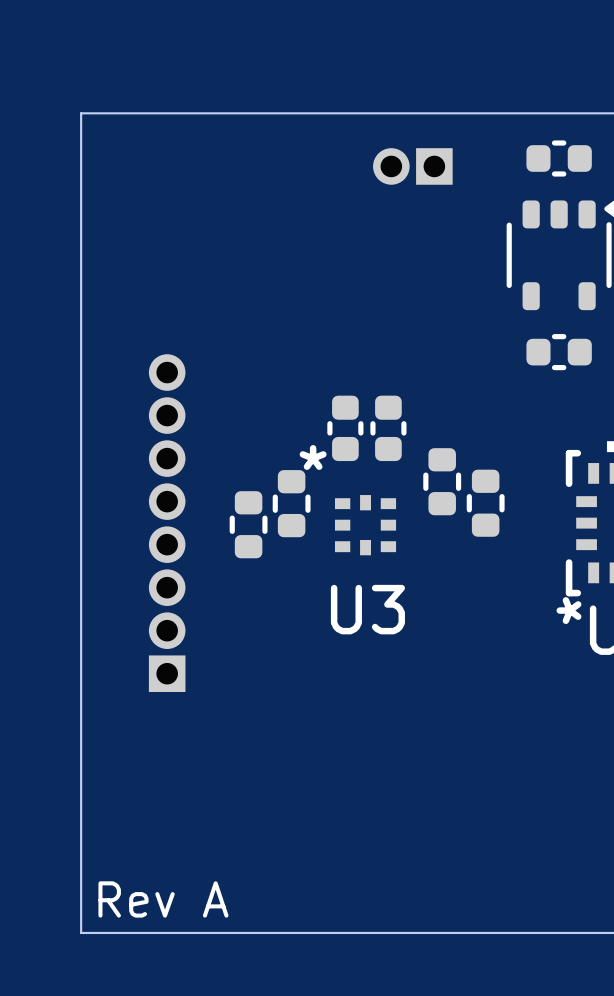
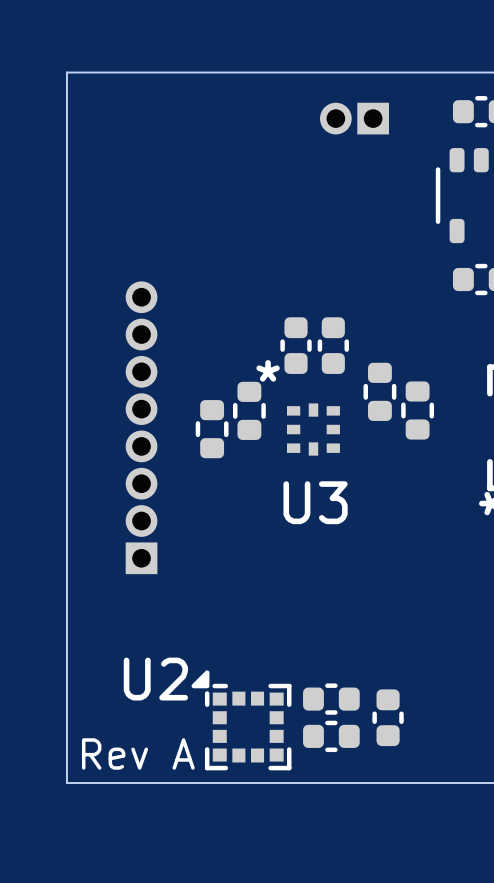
part: none -> (331, 699)
part: none -> (388, 717)
U2: none -> (241, 720)
part: none -> (331, 736)

